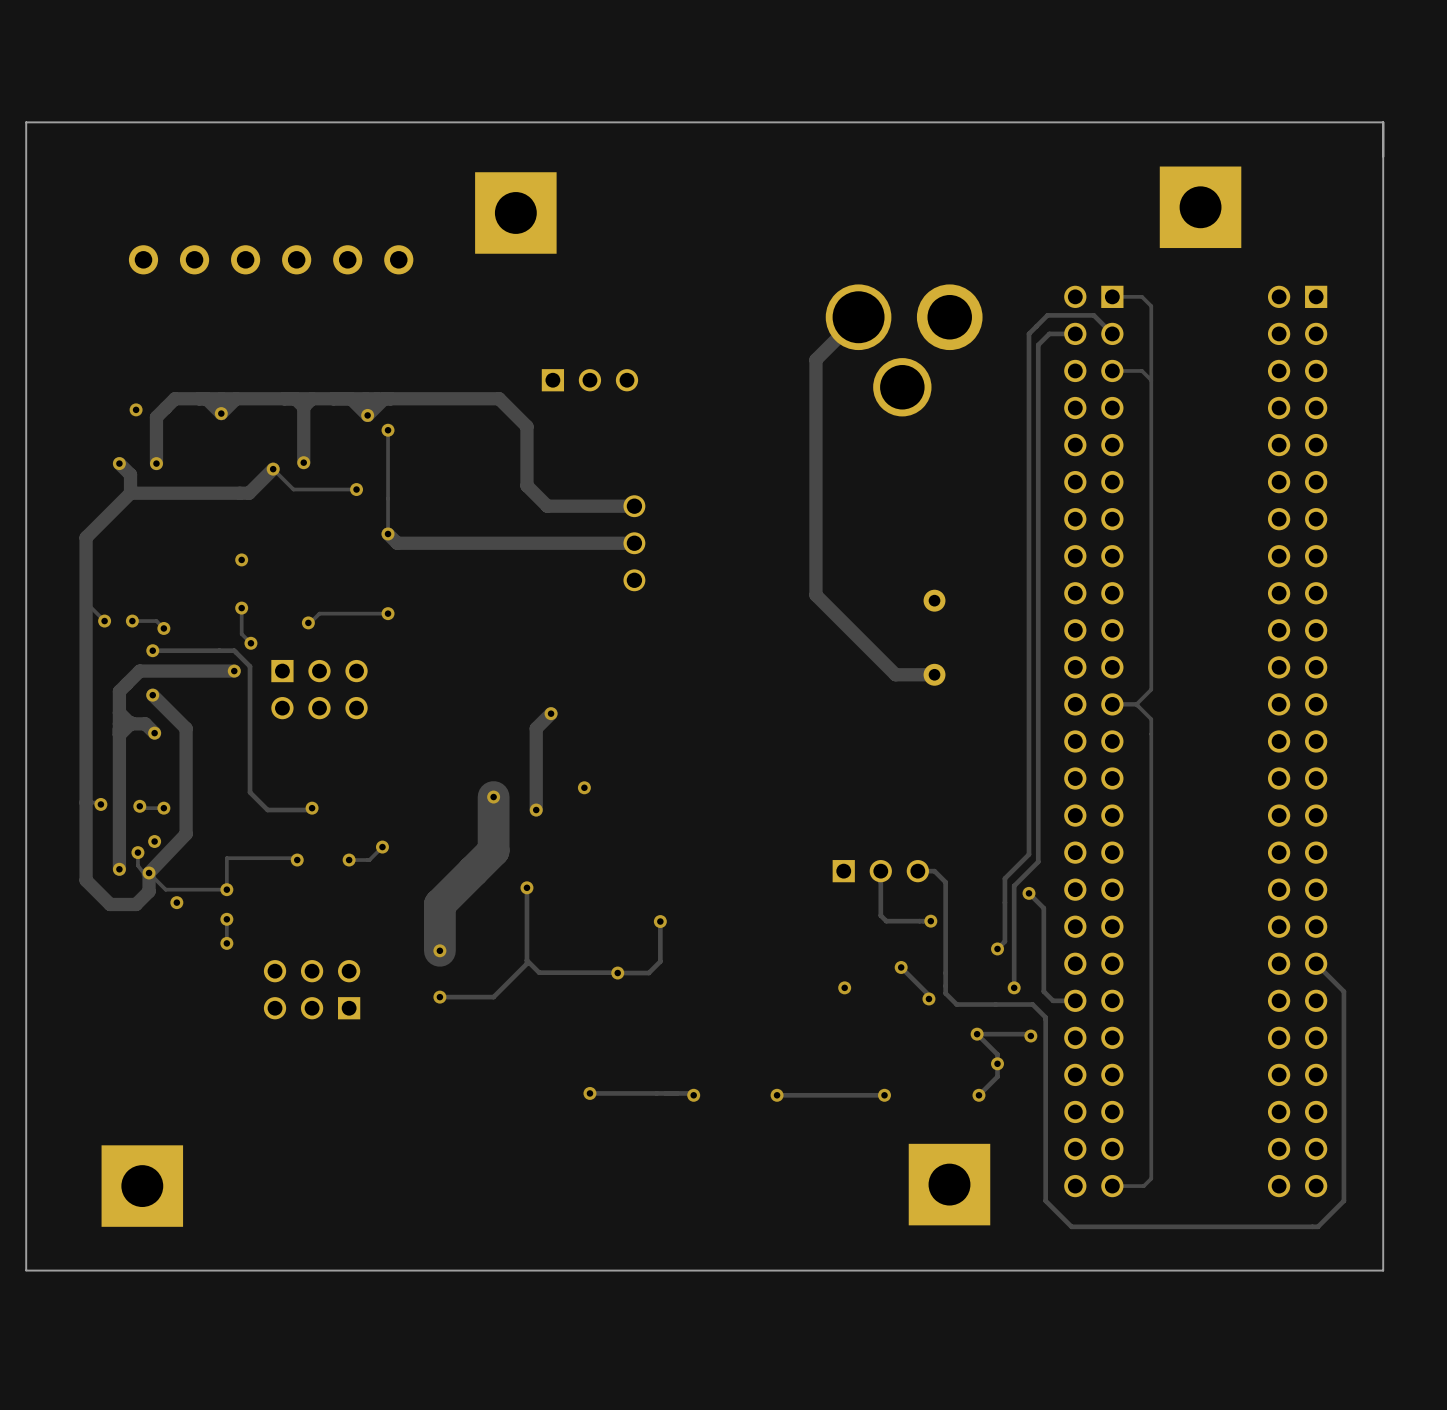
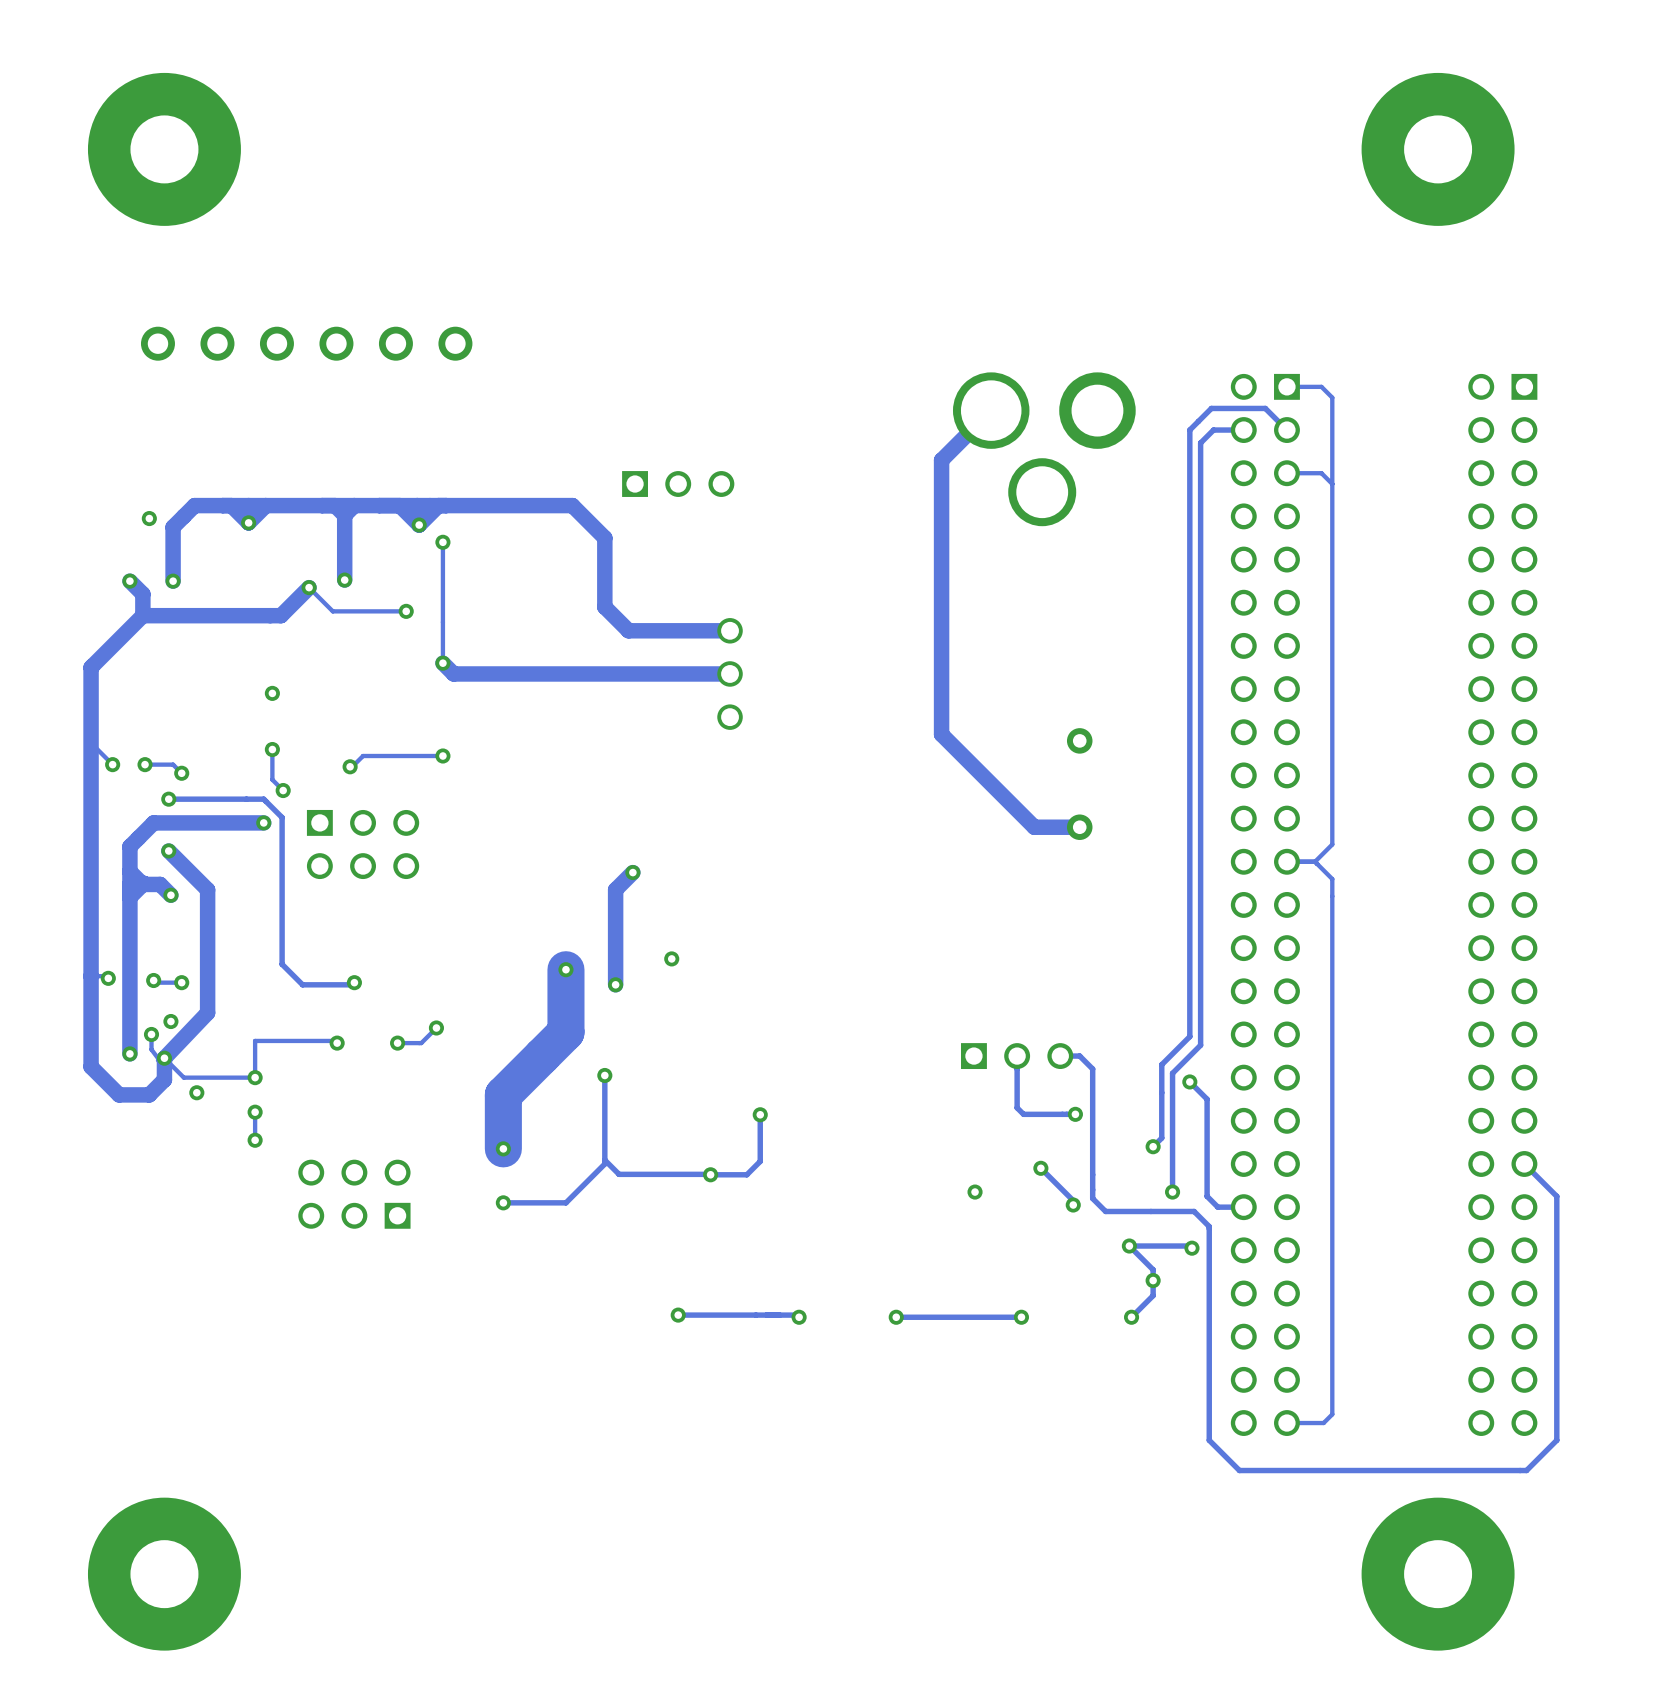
part: none -> (164, 149)
part: none -> (1438, 149)
part: (1200, 207) -> none
part: (515, 212) -> none
part: (949, 1184) -> none
part: (142, 1186) -> none
board edge: (26, 1270) (26, 122) (1383, 122) (1383, 1270) (26, 1270) -> none
part: none -> (164, 1574)
part: none -> (1438, 1574)

